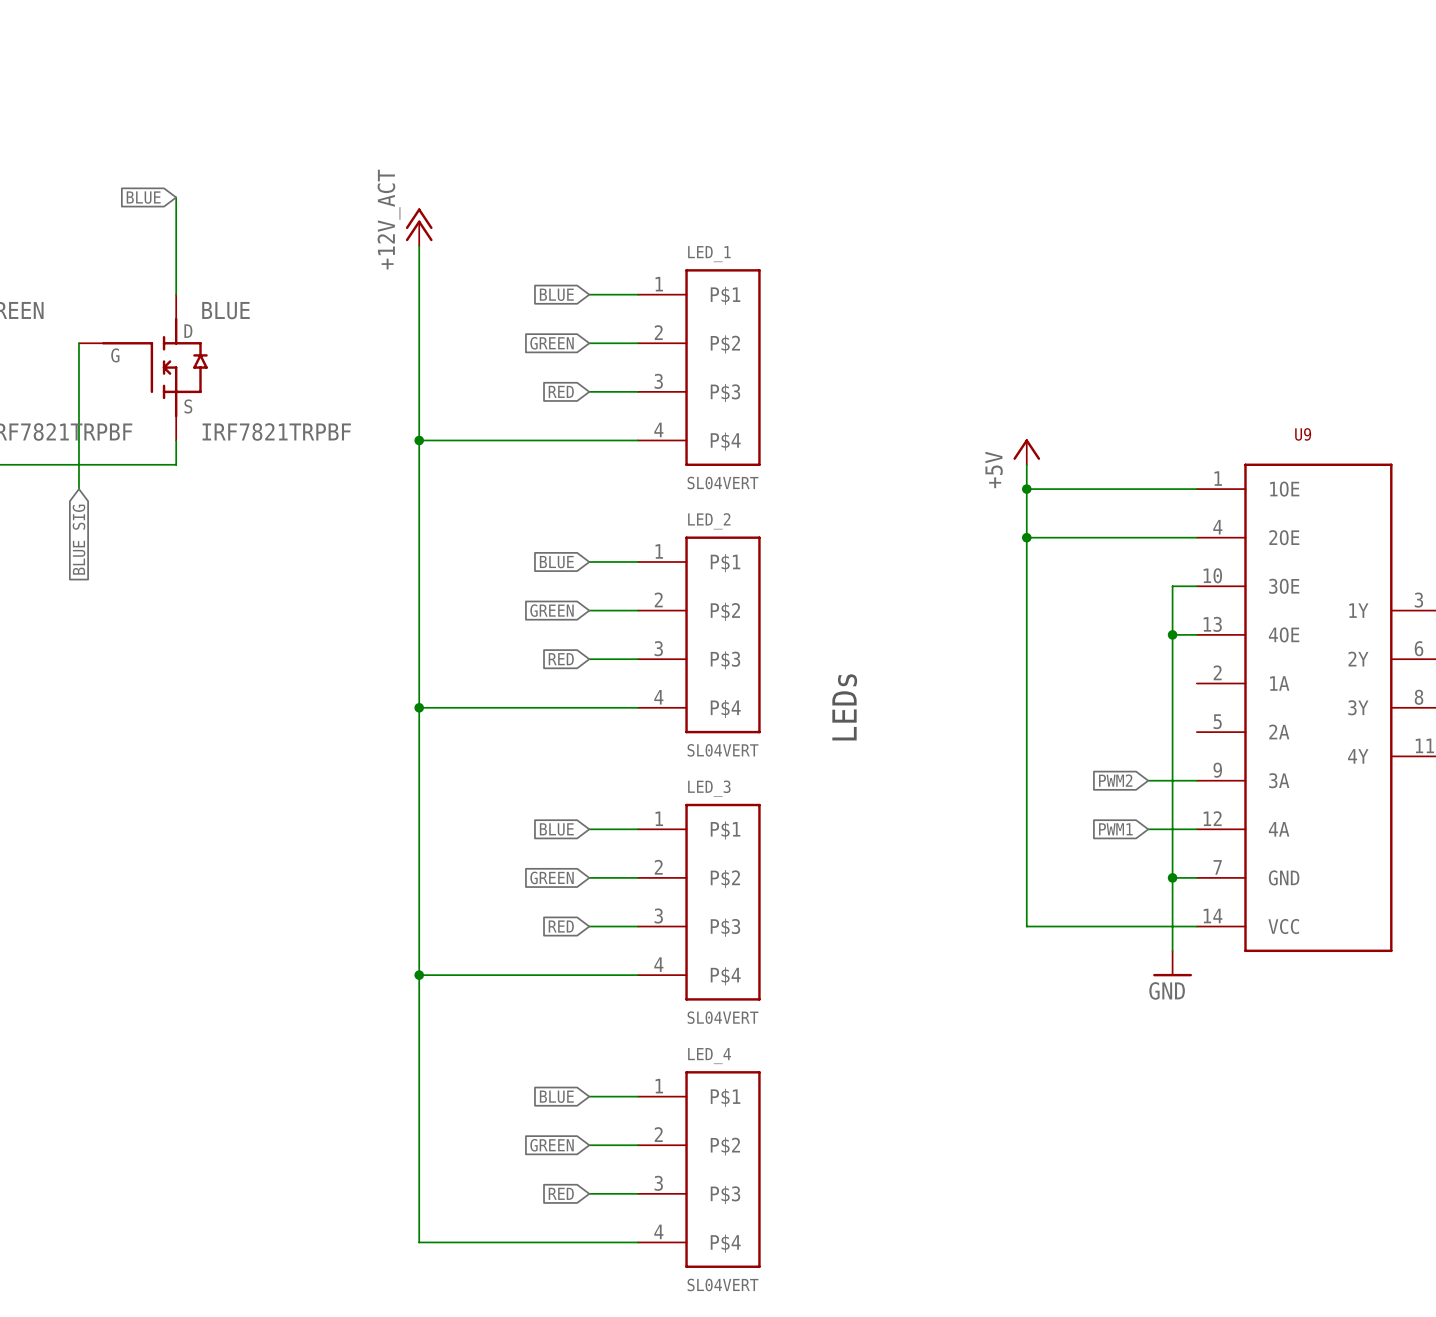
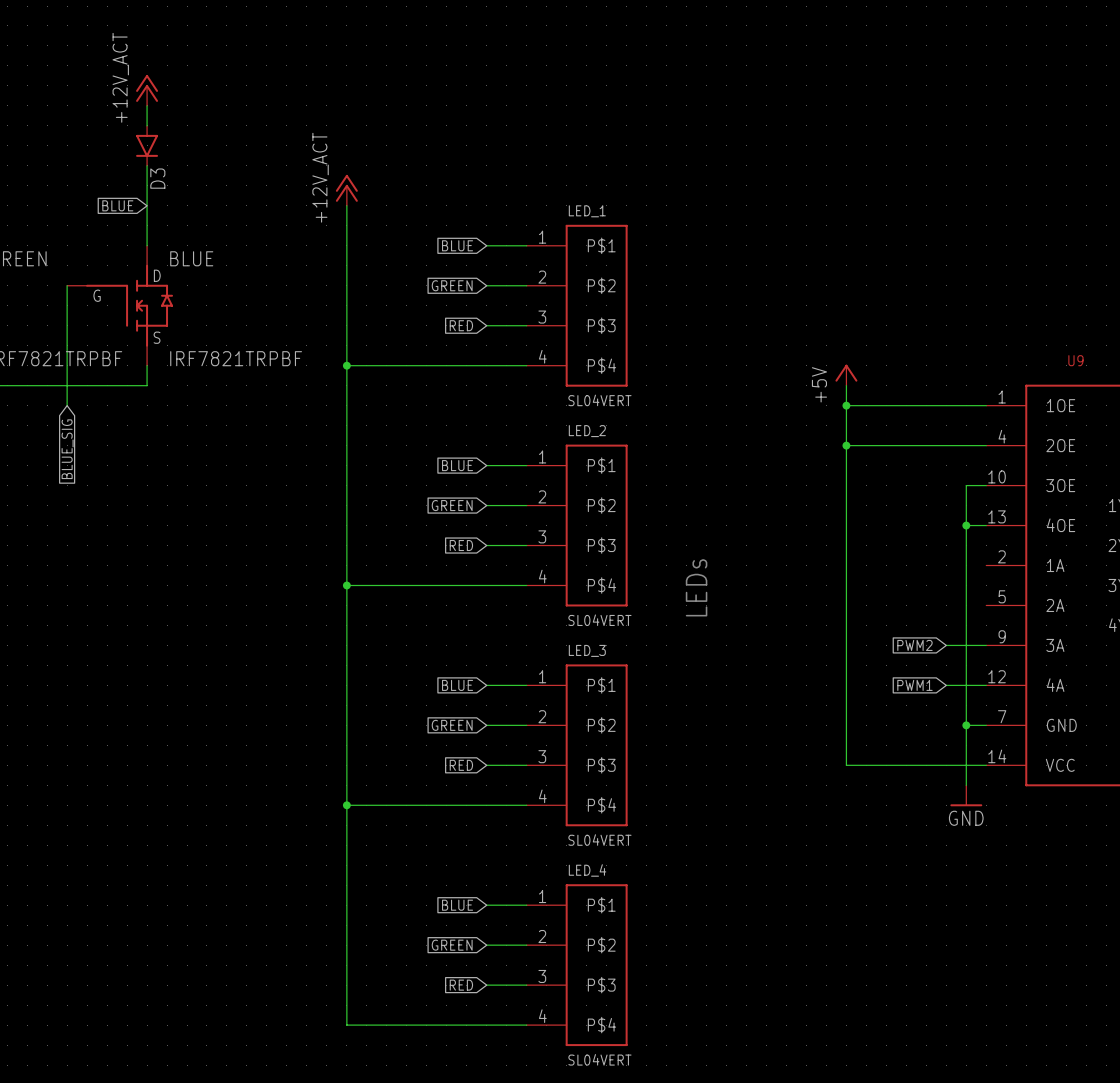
power symbol: none -> +12V_ACT (147, 90)
wire: none -> (147, 105) (147, 125)
D3: none -> (147, 145)
global label position: BLUE (143, 197) -> BLUE (117, 205)

